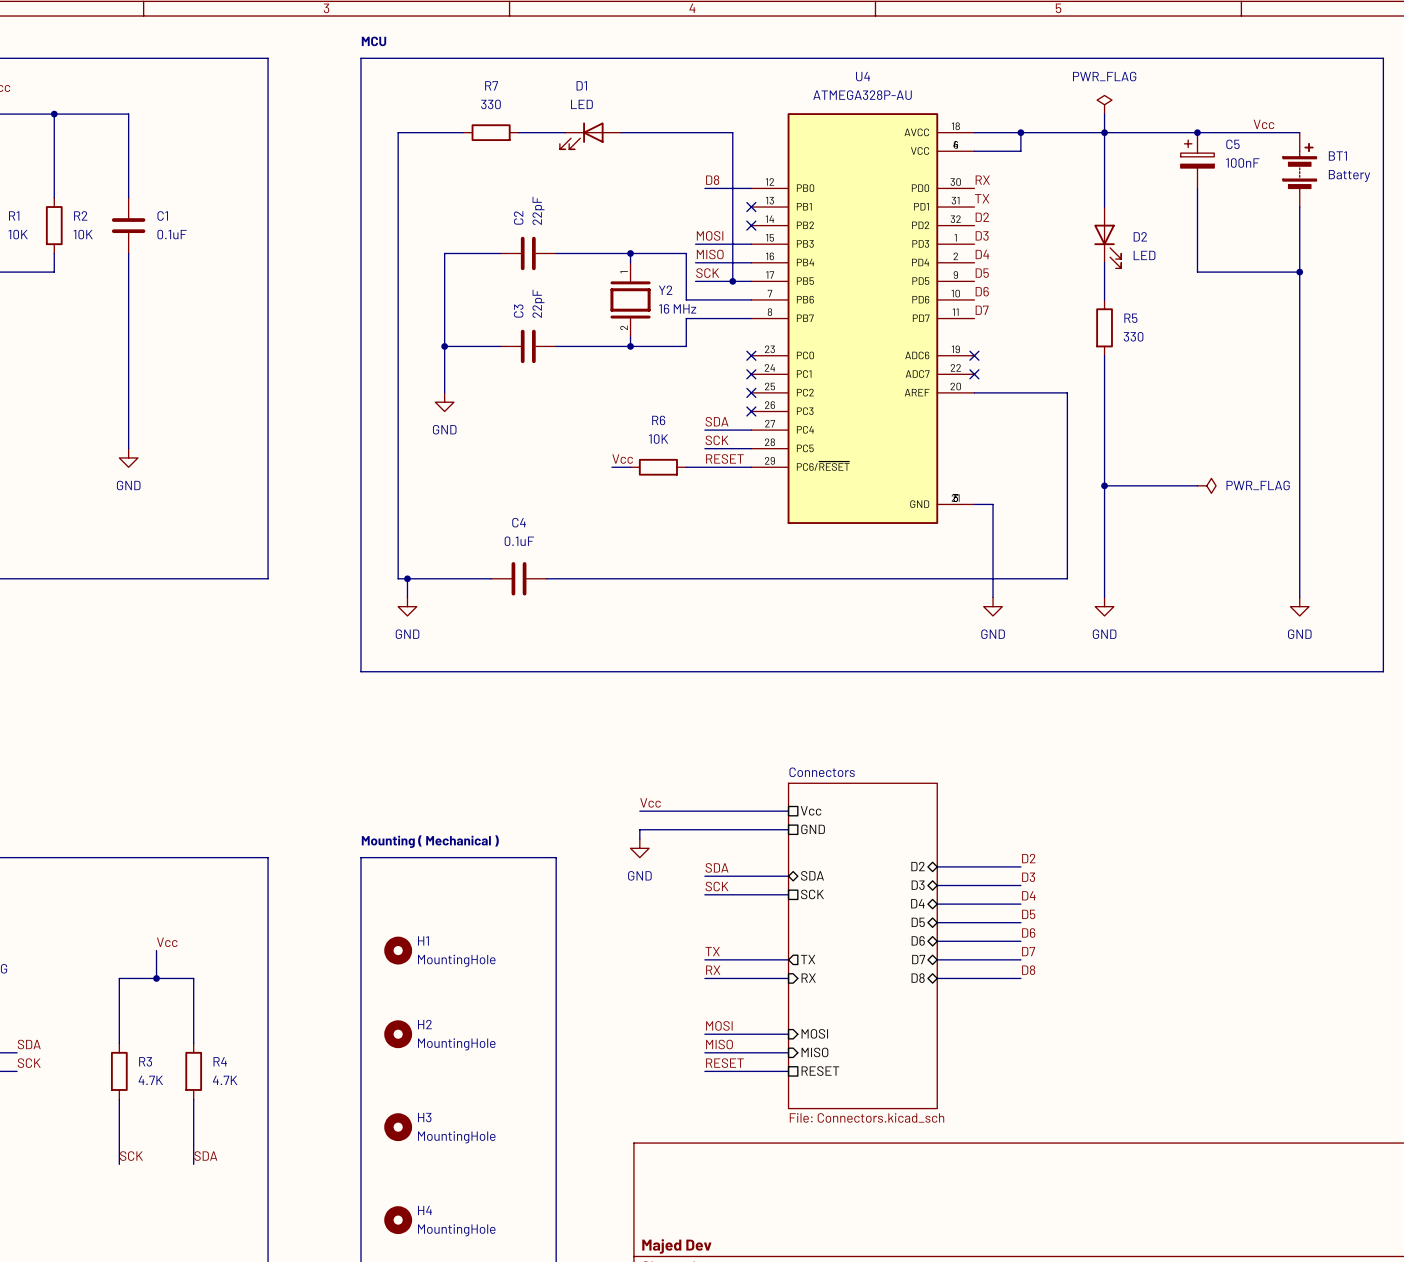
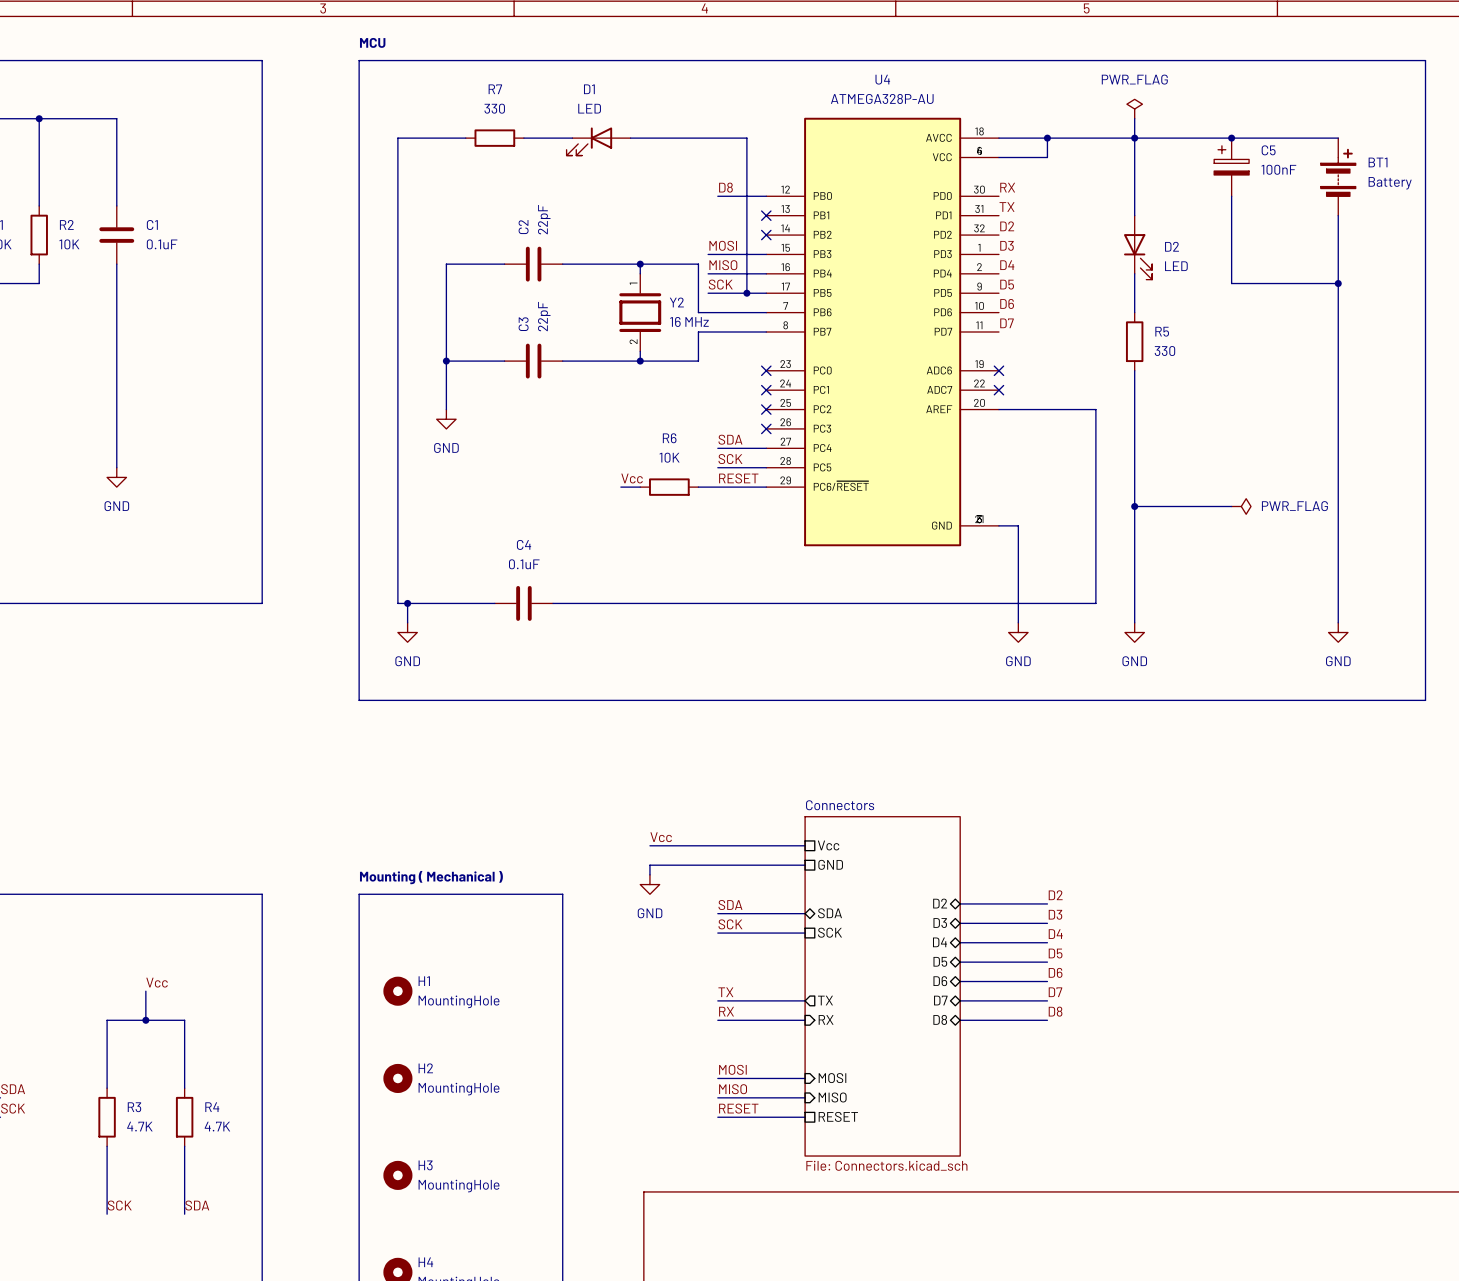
label: Vcc (1263, 124) -> none

